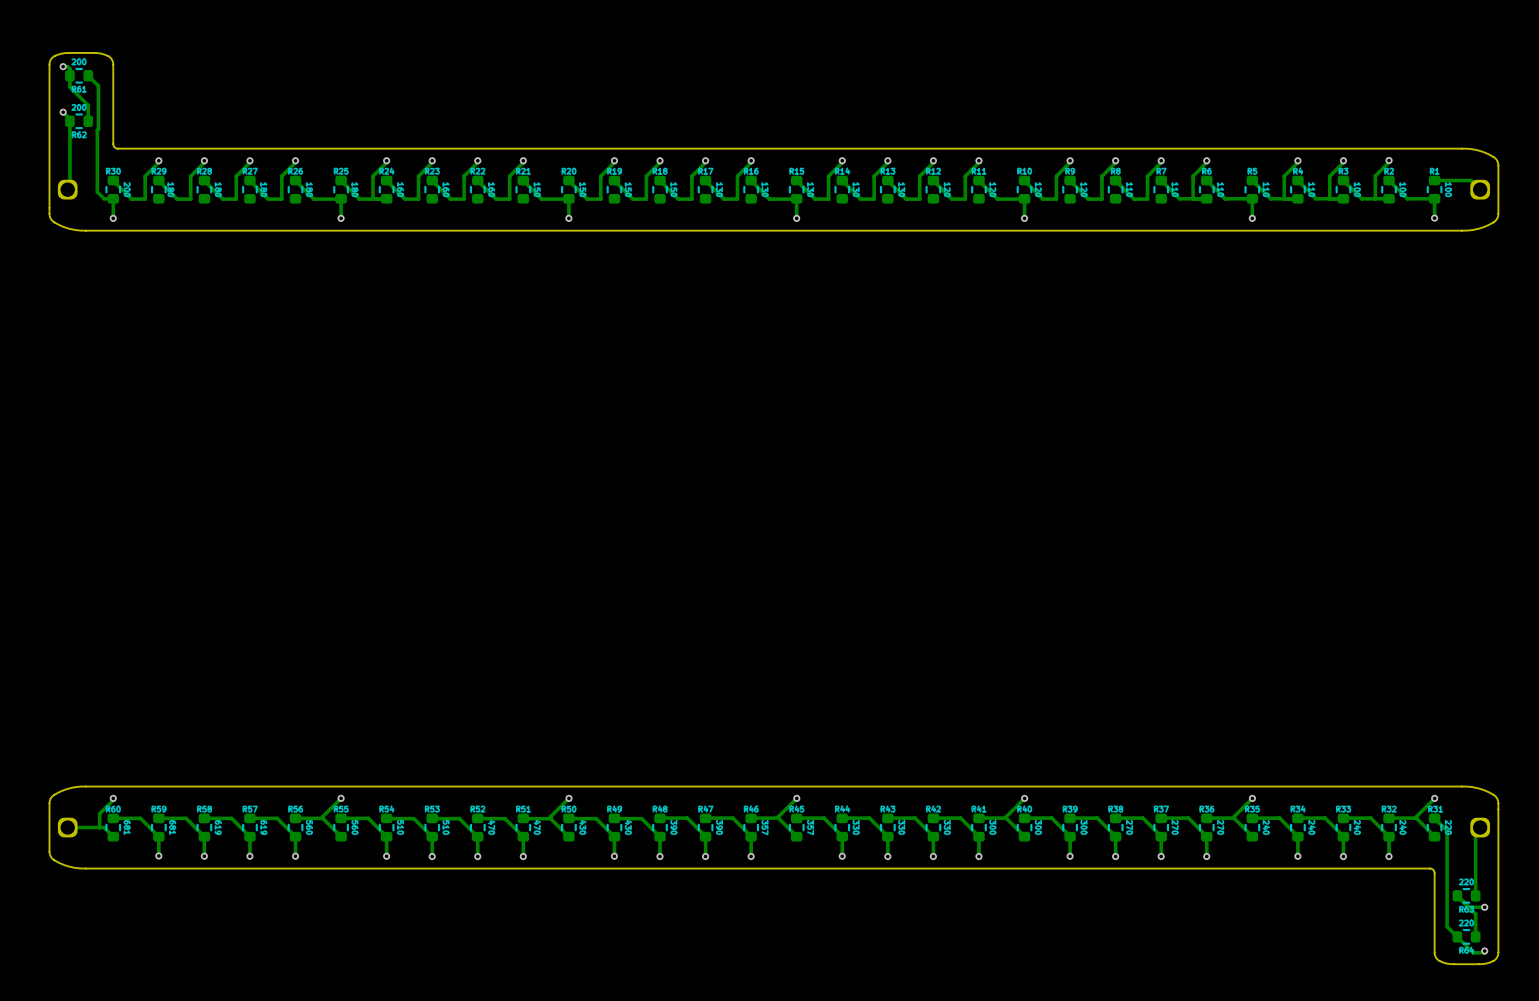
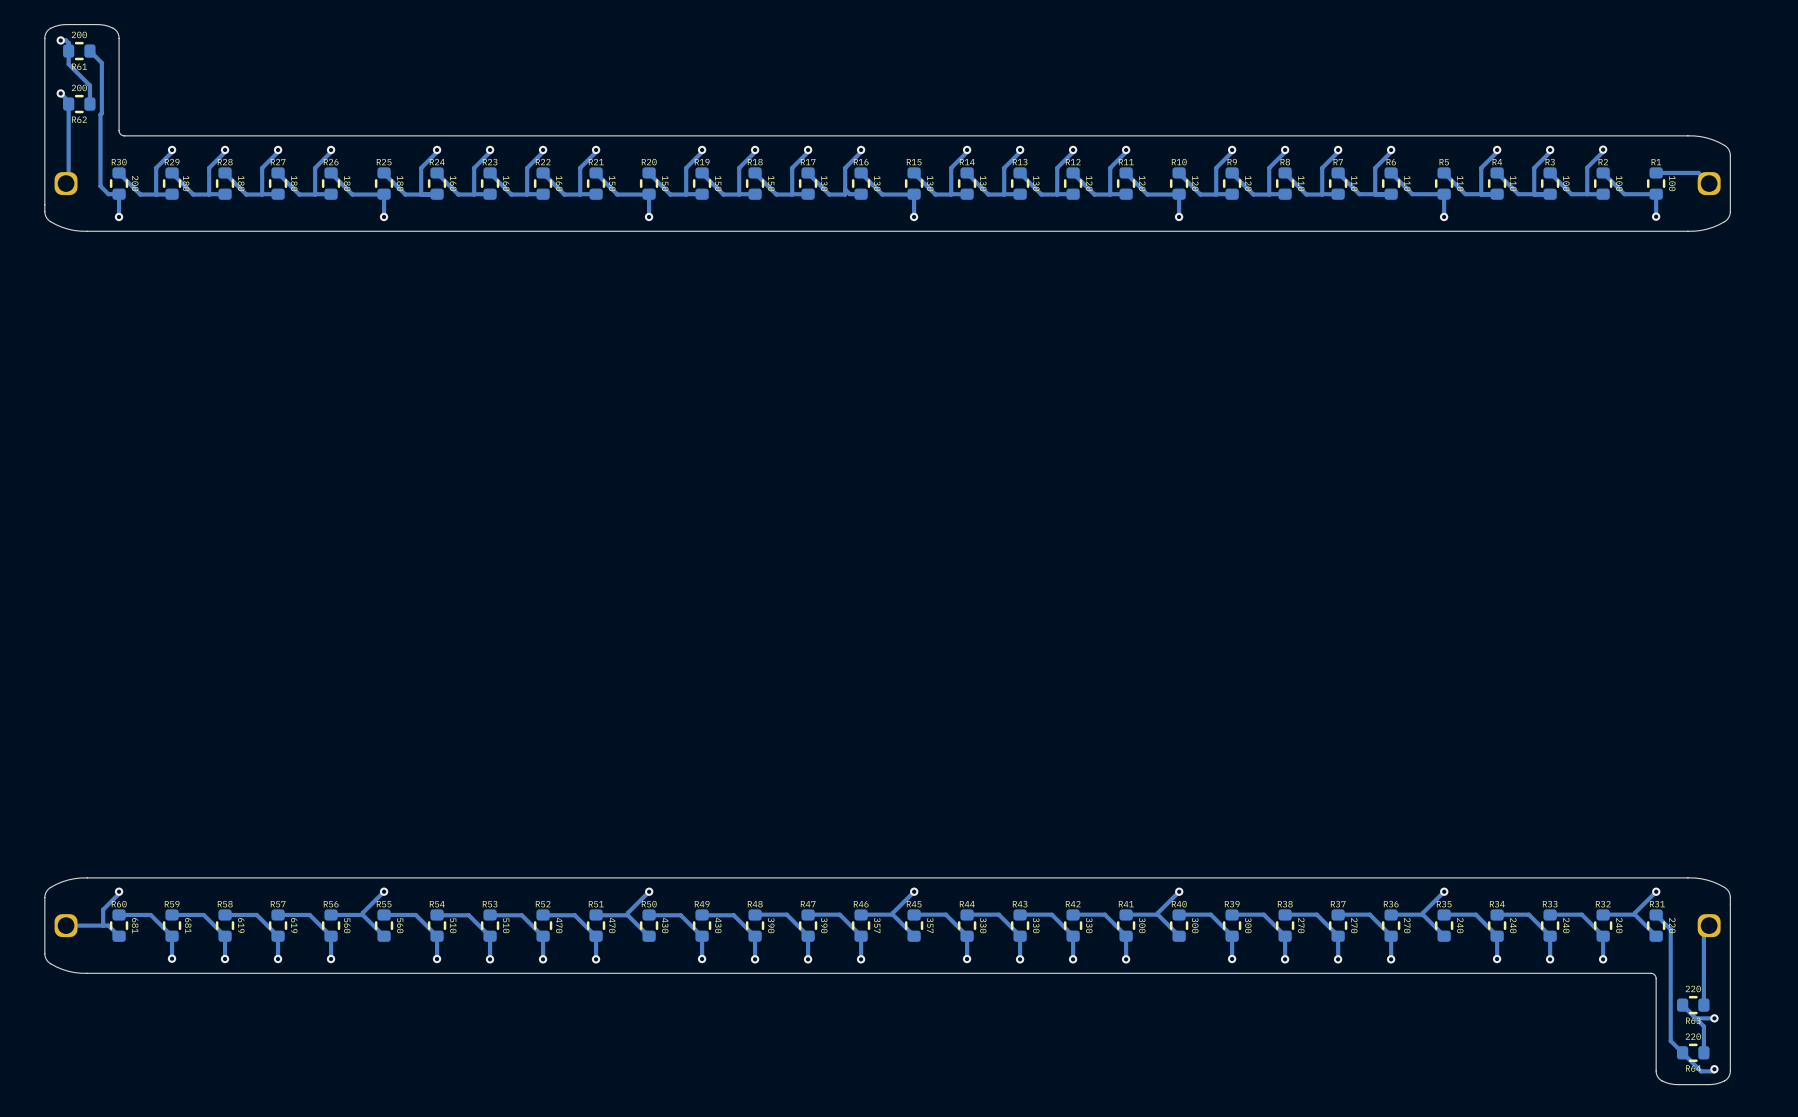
track: none -> (845, 189) (850, 194) (861, 194)
track: none -> (172, 194) (156, 194)
track: none -> (225, 194) (209, 194)
track: none -> (278, 194) (262, 194)
track: none -> (331, 194) (315, 194)
track: none -> (490, 194) (474, 194)
track: none -> (543, 194) (527, 194)
track: none -> (596, 194) (580, 194)
track: none -> (702, 194) (686, 194)
track: none -> (755, 194) (739, 194)
track: none -> (808, 194) (792, 194)
track: none -> (967, 194) (951, 194)
track: none -> (1020, 194) (1004, 194)
track: none -> (1073, 194) (1057, 194)
track: none -> (1126, 194) (1110, 194)
track: none -> (1232, 194) (1216, 194)
track: none -> (1285, 194) (1269, 194)
track: none -> (1338, 194) (1322, 194)

